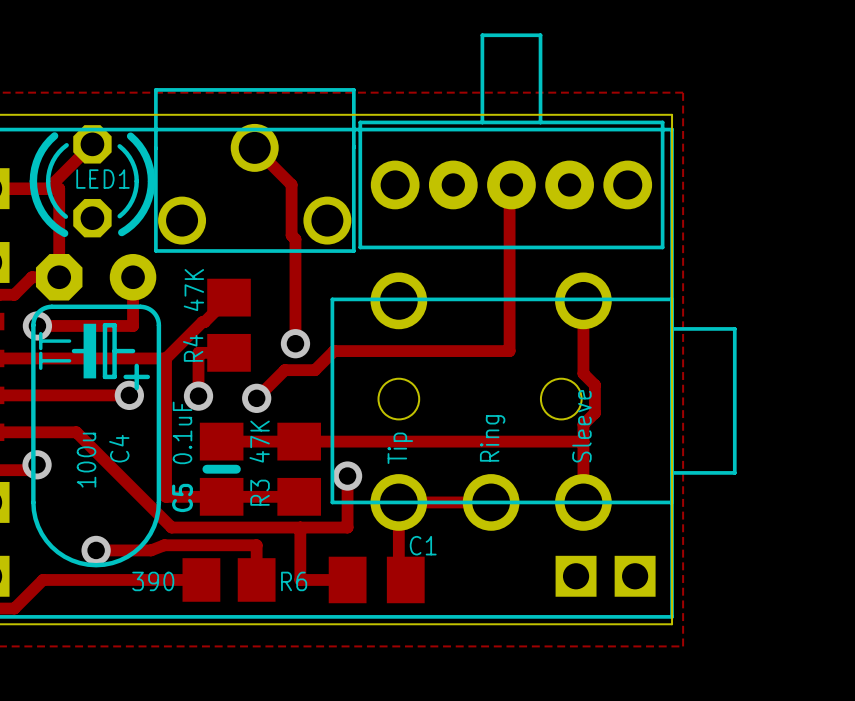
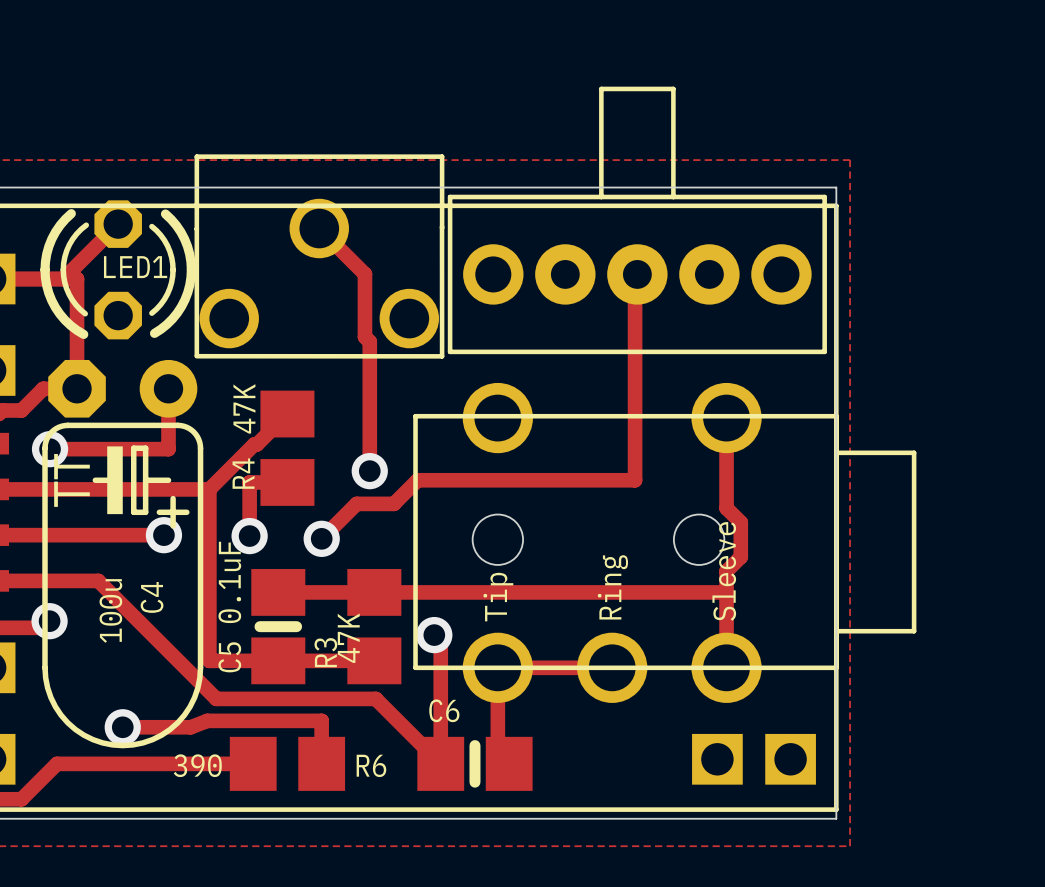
R3 value position: 47K (259, 441) -> 47K (348, 638)
track: (347, 476) (347, 527) (300, 527) (300, 579) (347, 579) -> none
track: none -> (440, 635) (440, 763) (375, 698)
C1: (376, 579) -> none
C6: none -> (474, 763)

